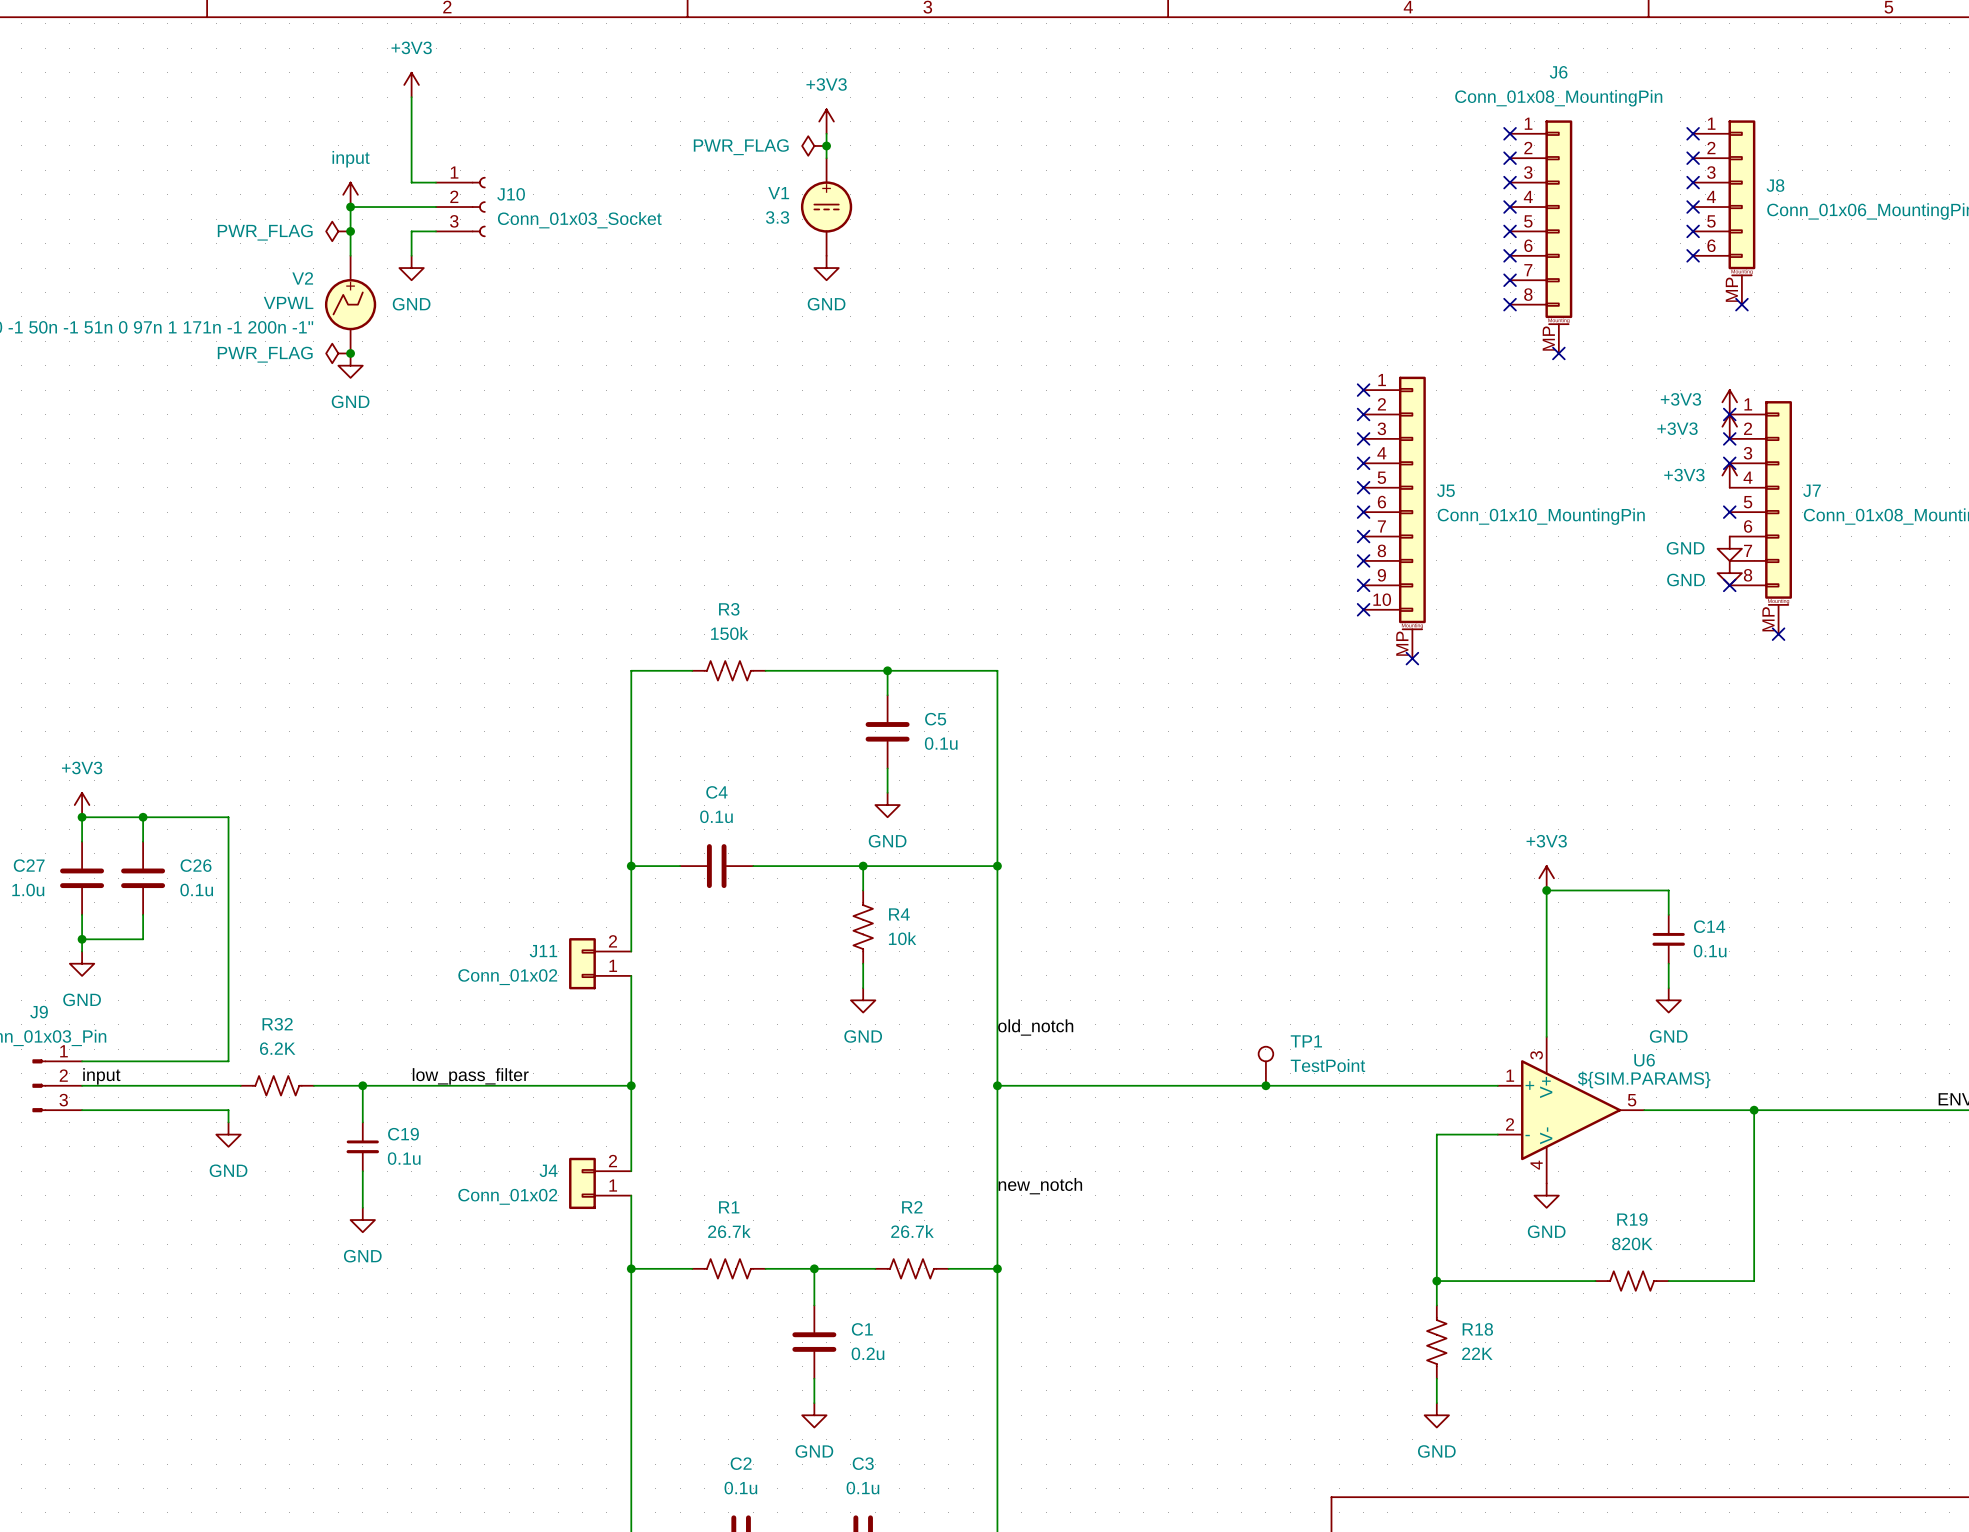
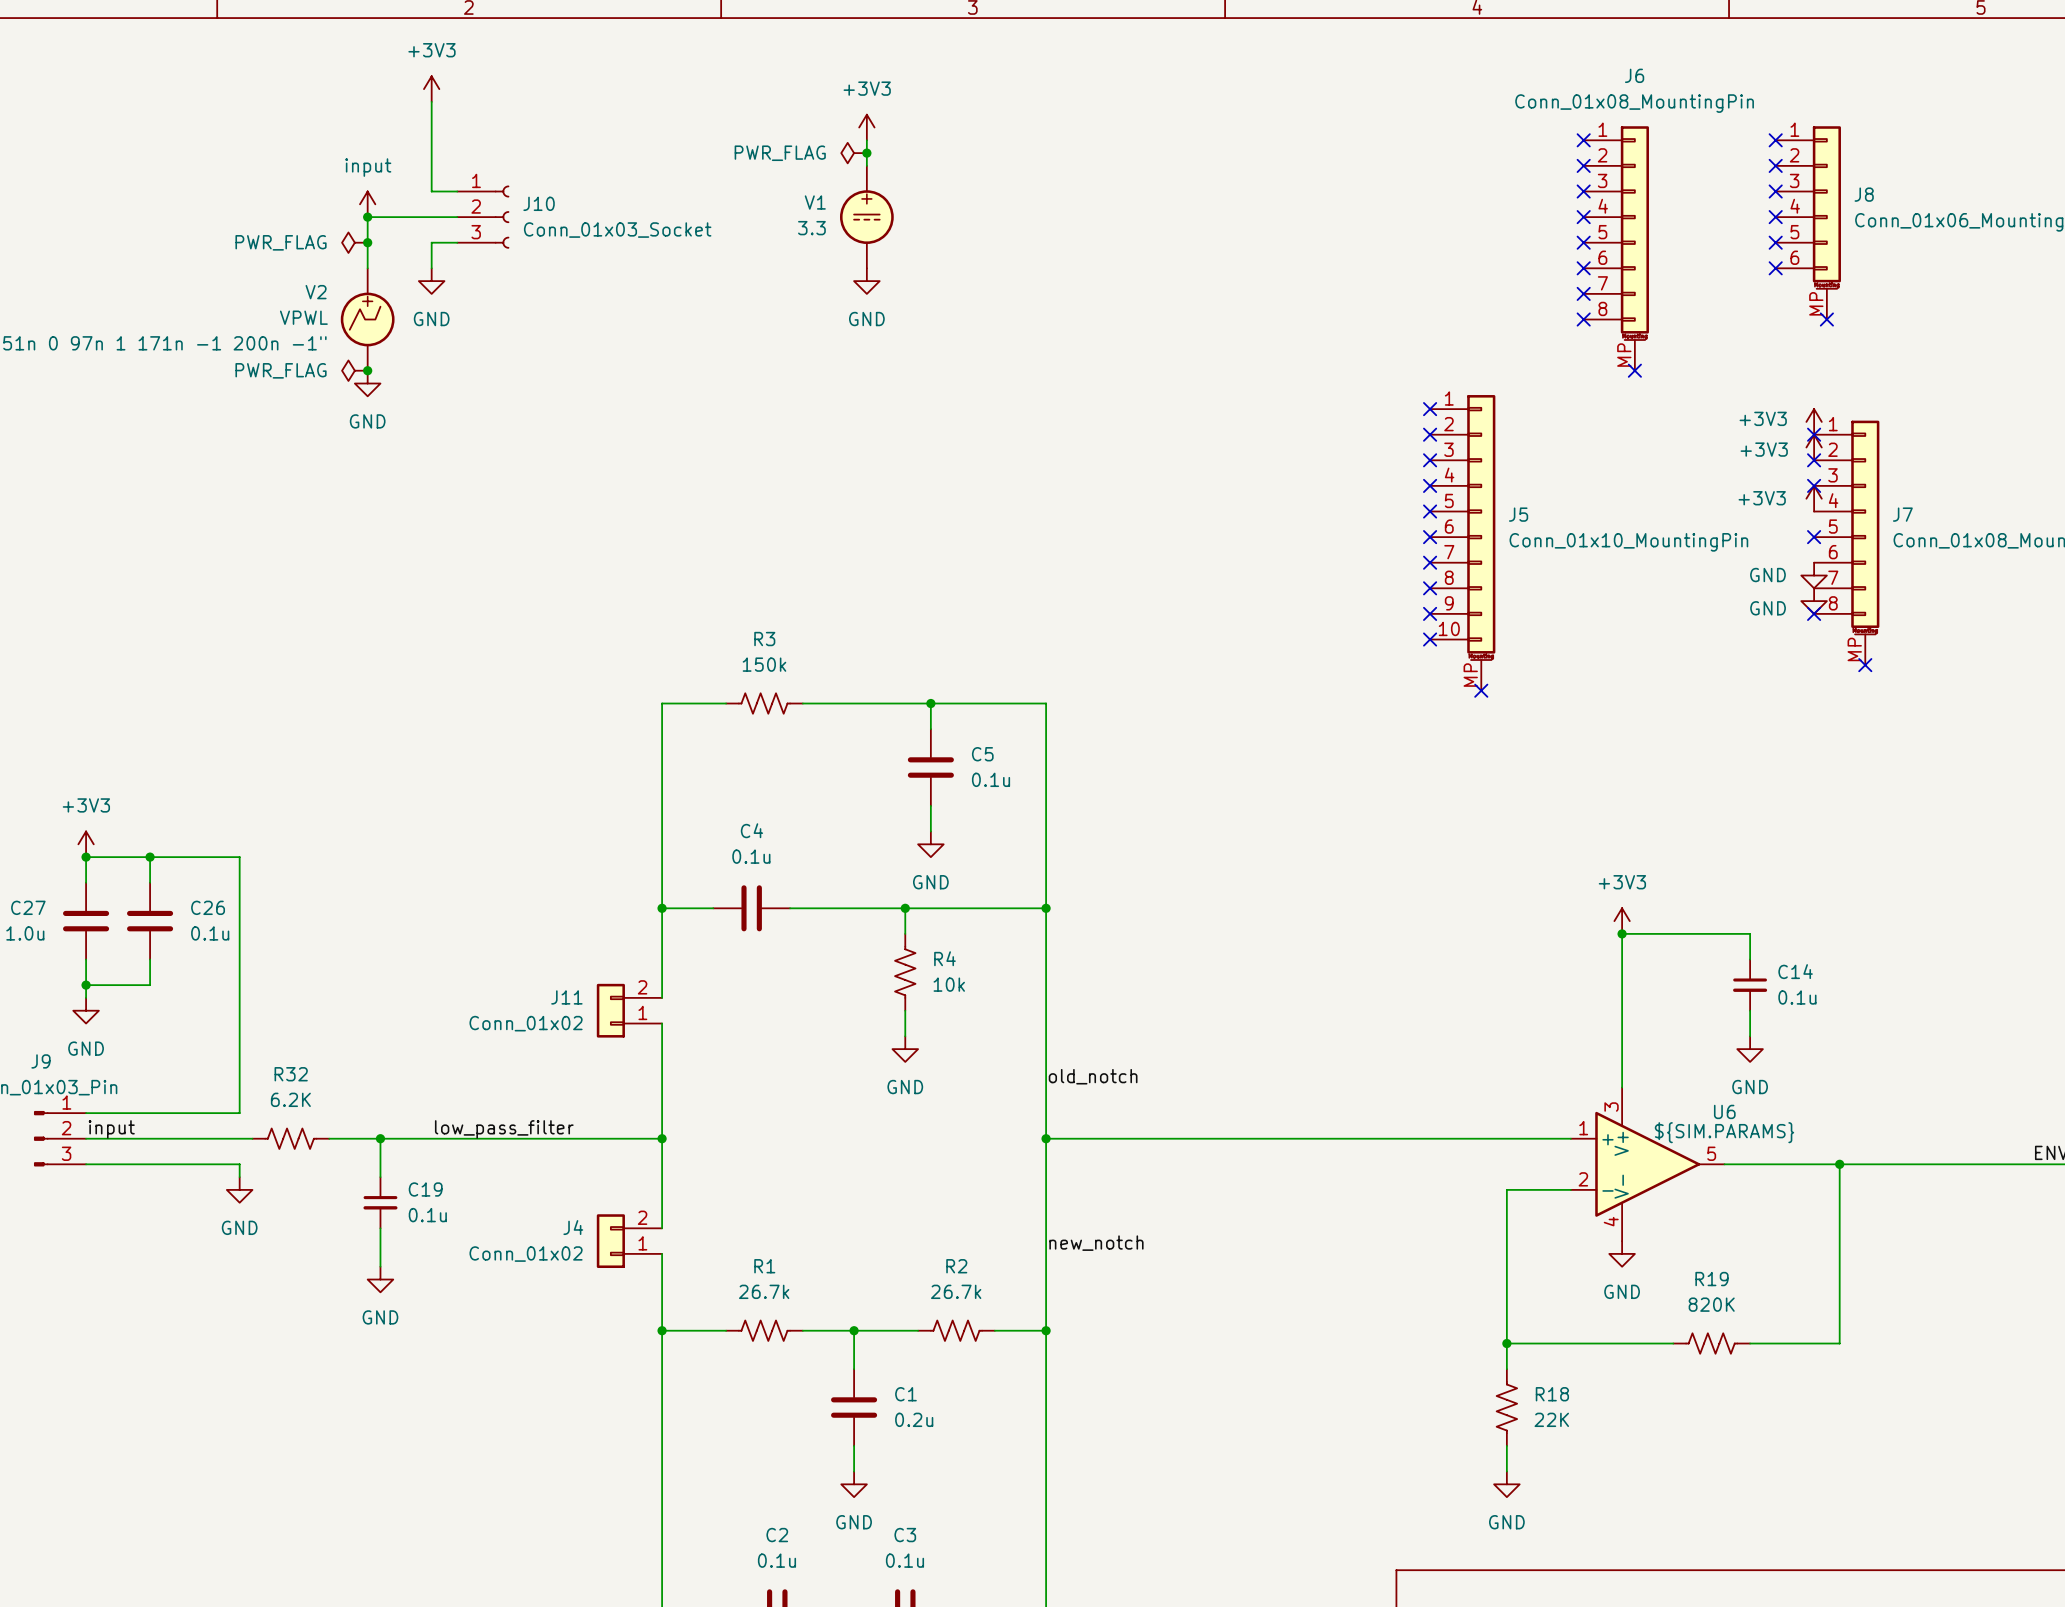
TP1: TestPoint (1265, 1066) -> none
junction: (1265, 1085) -> none

